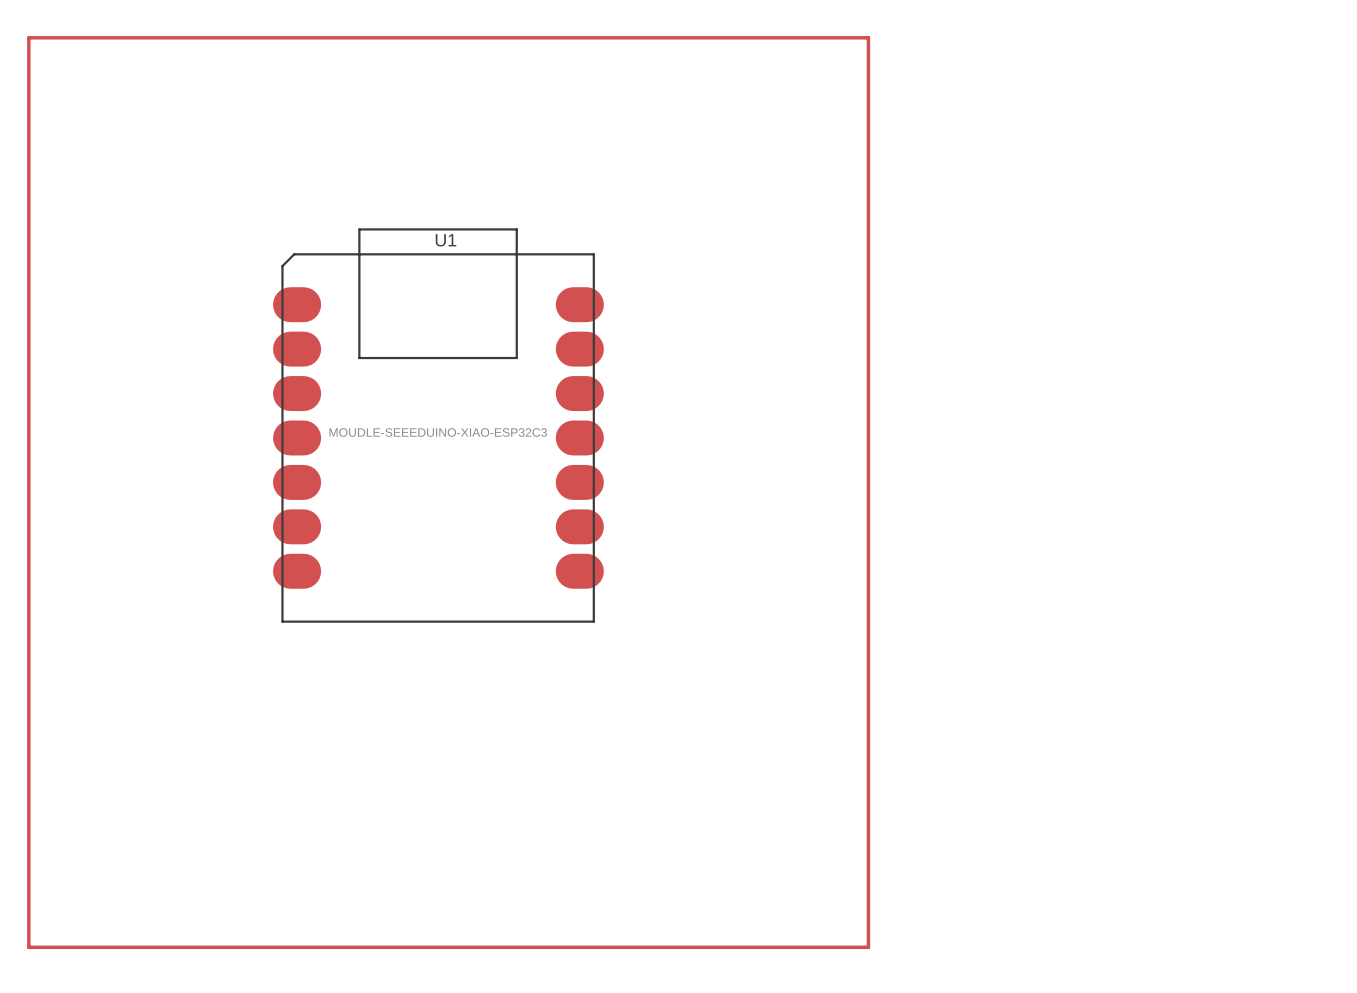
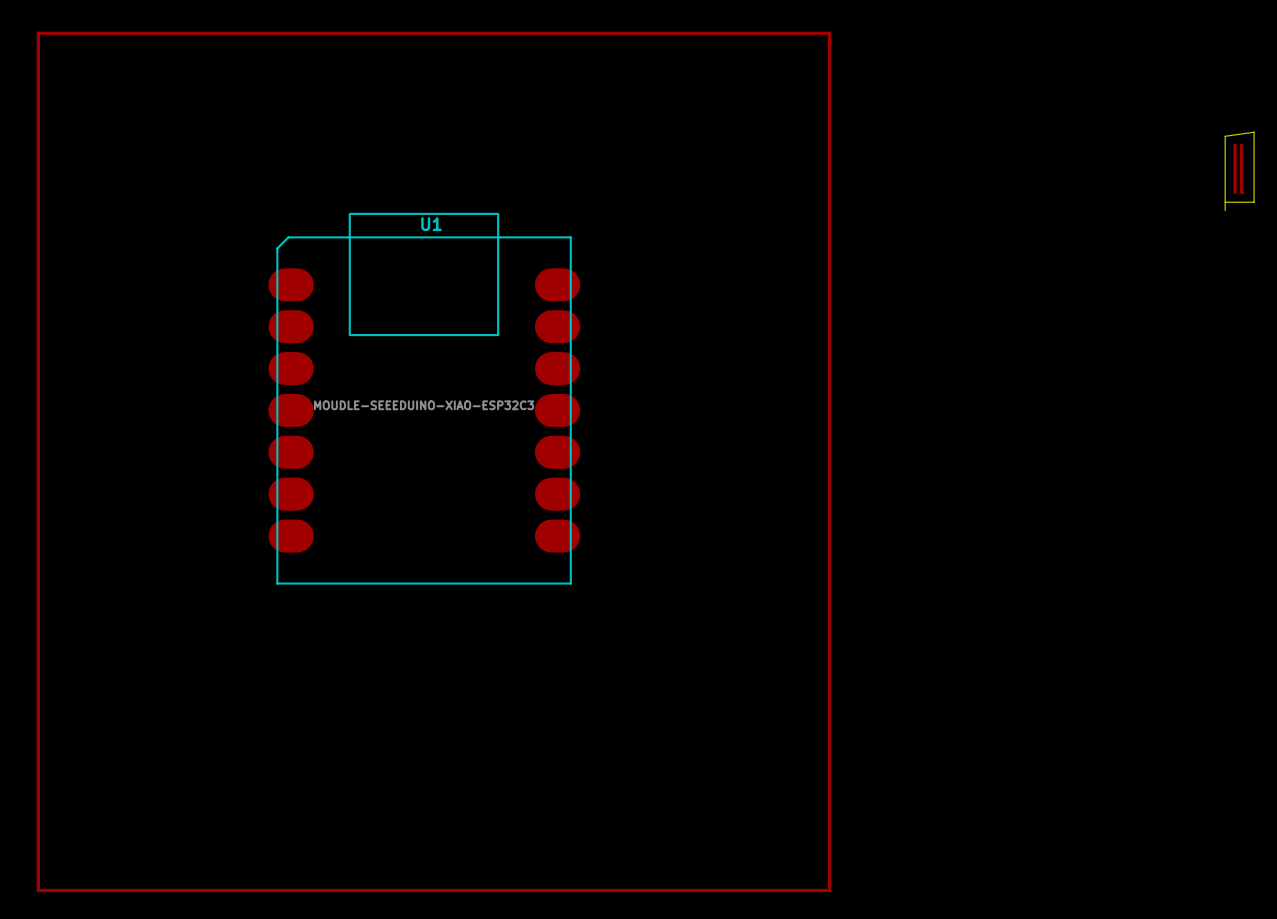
track: none -> (1235, 145) (1235, 192)
track: none -> (1241, 145) (1241, 192)
board edge: none -> (1225, 202) (1254, 202) (1254, 132) (1225, 136) (1225, 210)

